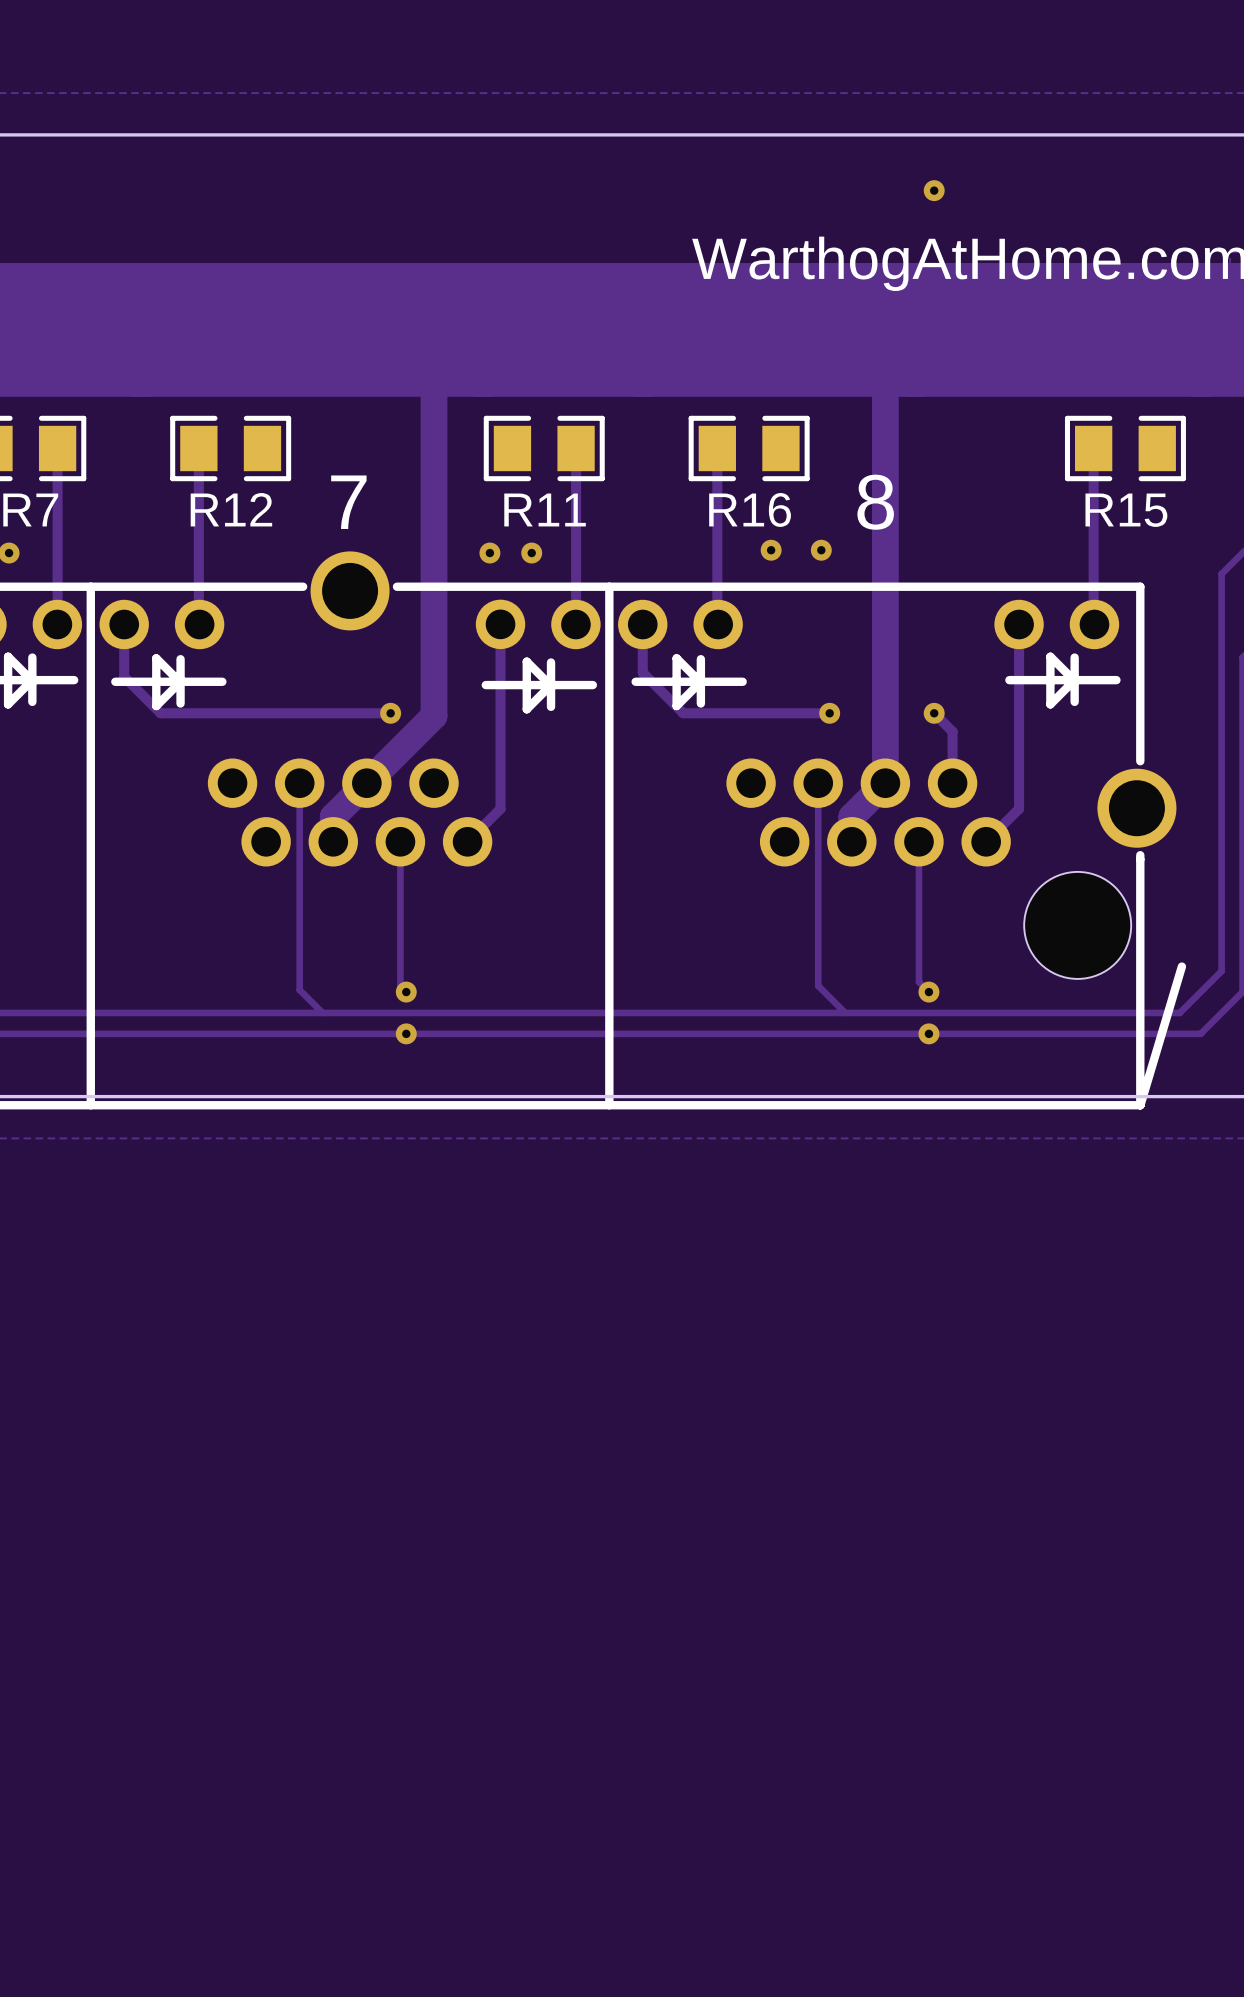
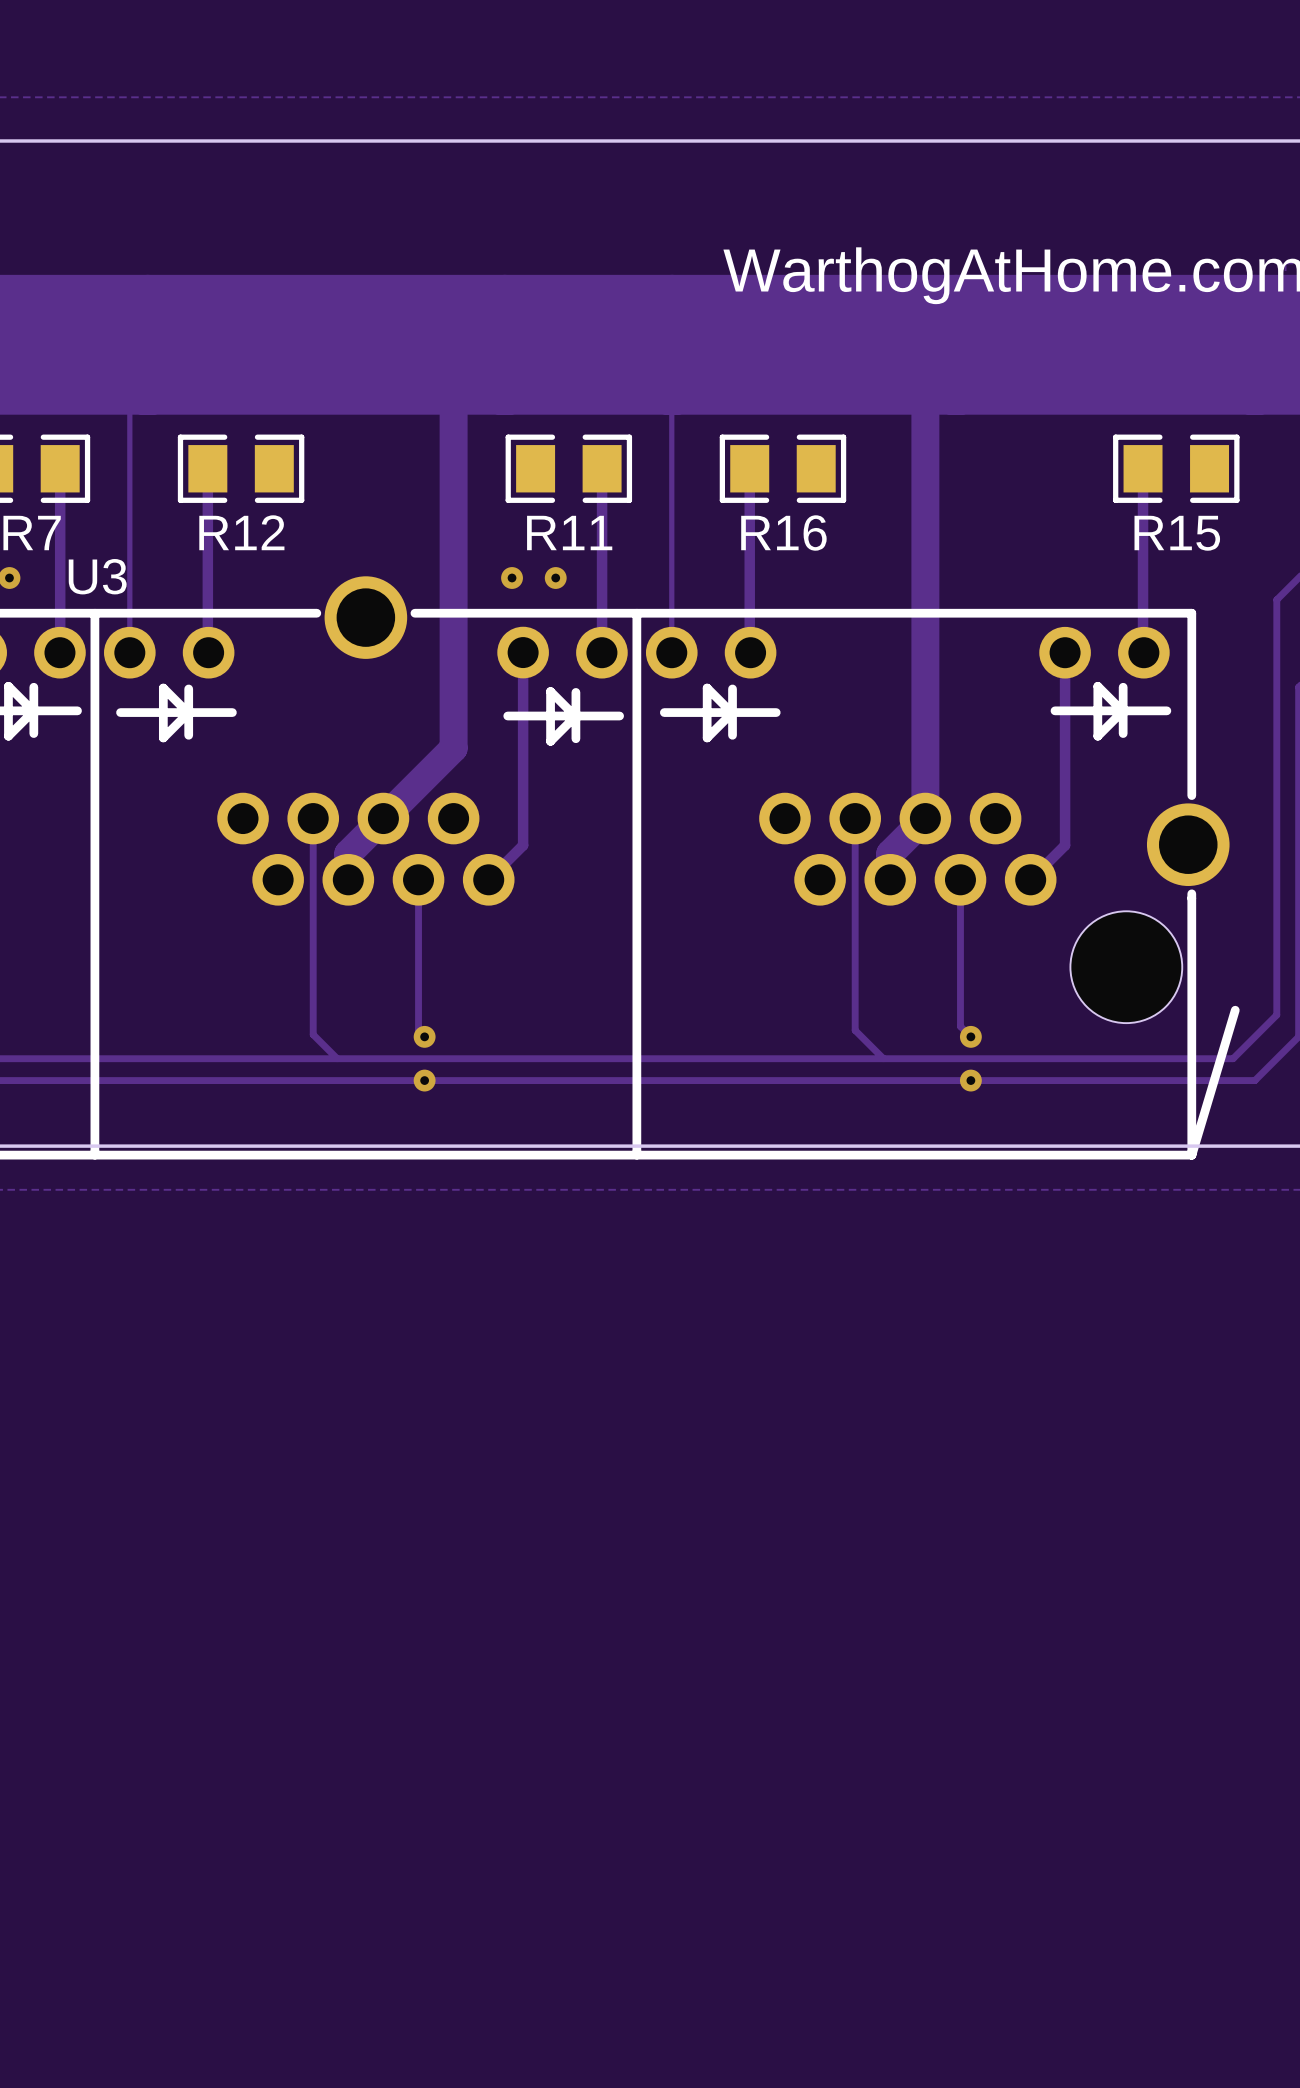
via: (934, 190) -> none
text: 7 (348, 502) -> none
text: 8 (875, 502) -> none
via: (771, 550) -> none
via: (821, 550) -> none
U3 name: none -> U3 (97, 576)
track: (124, 624) (124, 676) (160, 713) (390, 713) -> (129, 652) (129, 362) (147, 344)
track: (642, 624) (642, 672) (683, 713) (829, 713) -> (671, 652) (671, 345)
via: (390, 713) -> none
via: (829, 713) -> none
track: (934, 713) (952, 731) (952, 783) -> none
via: (934, 713) -> none

